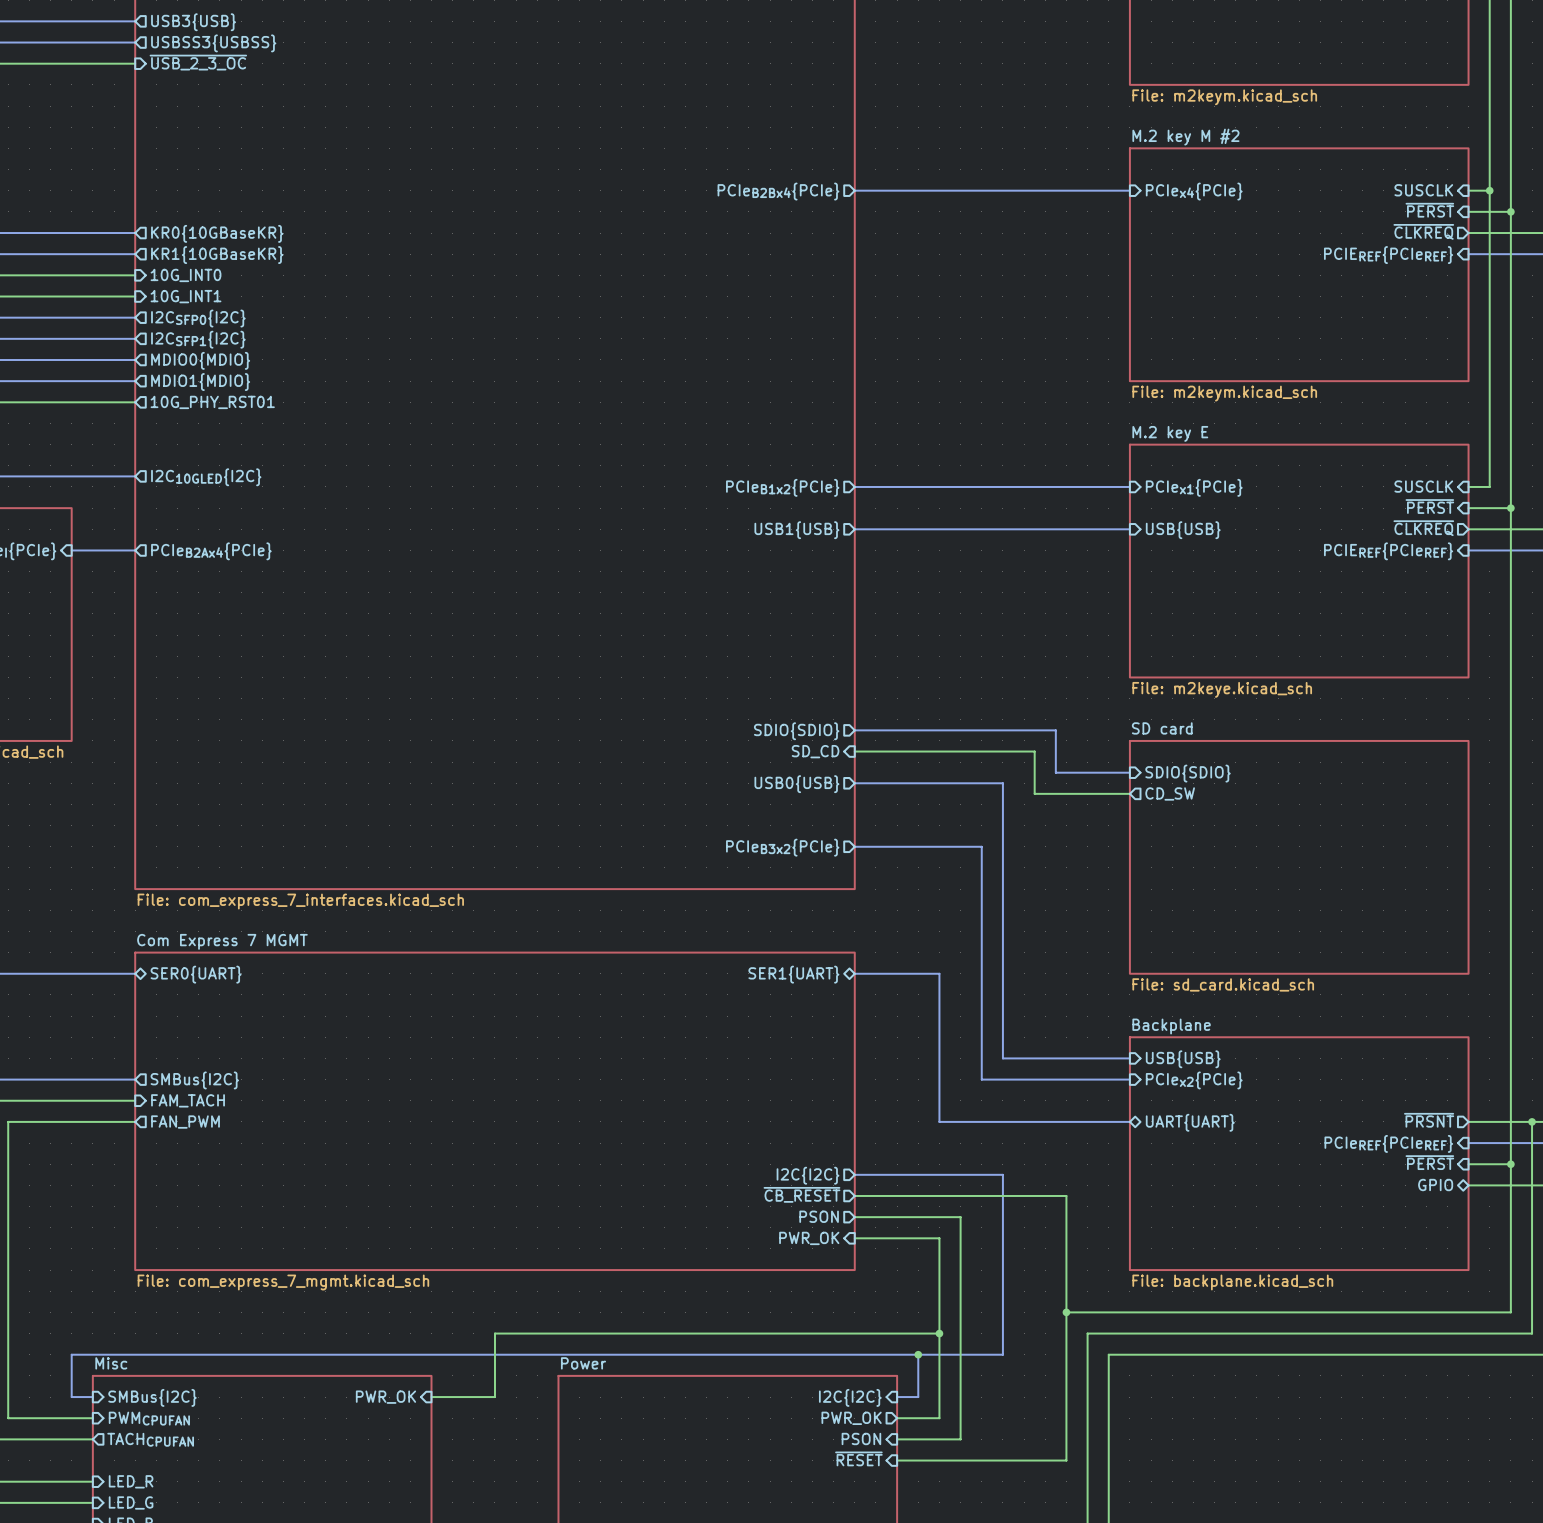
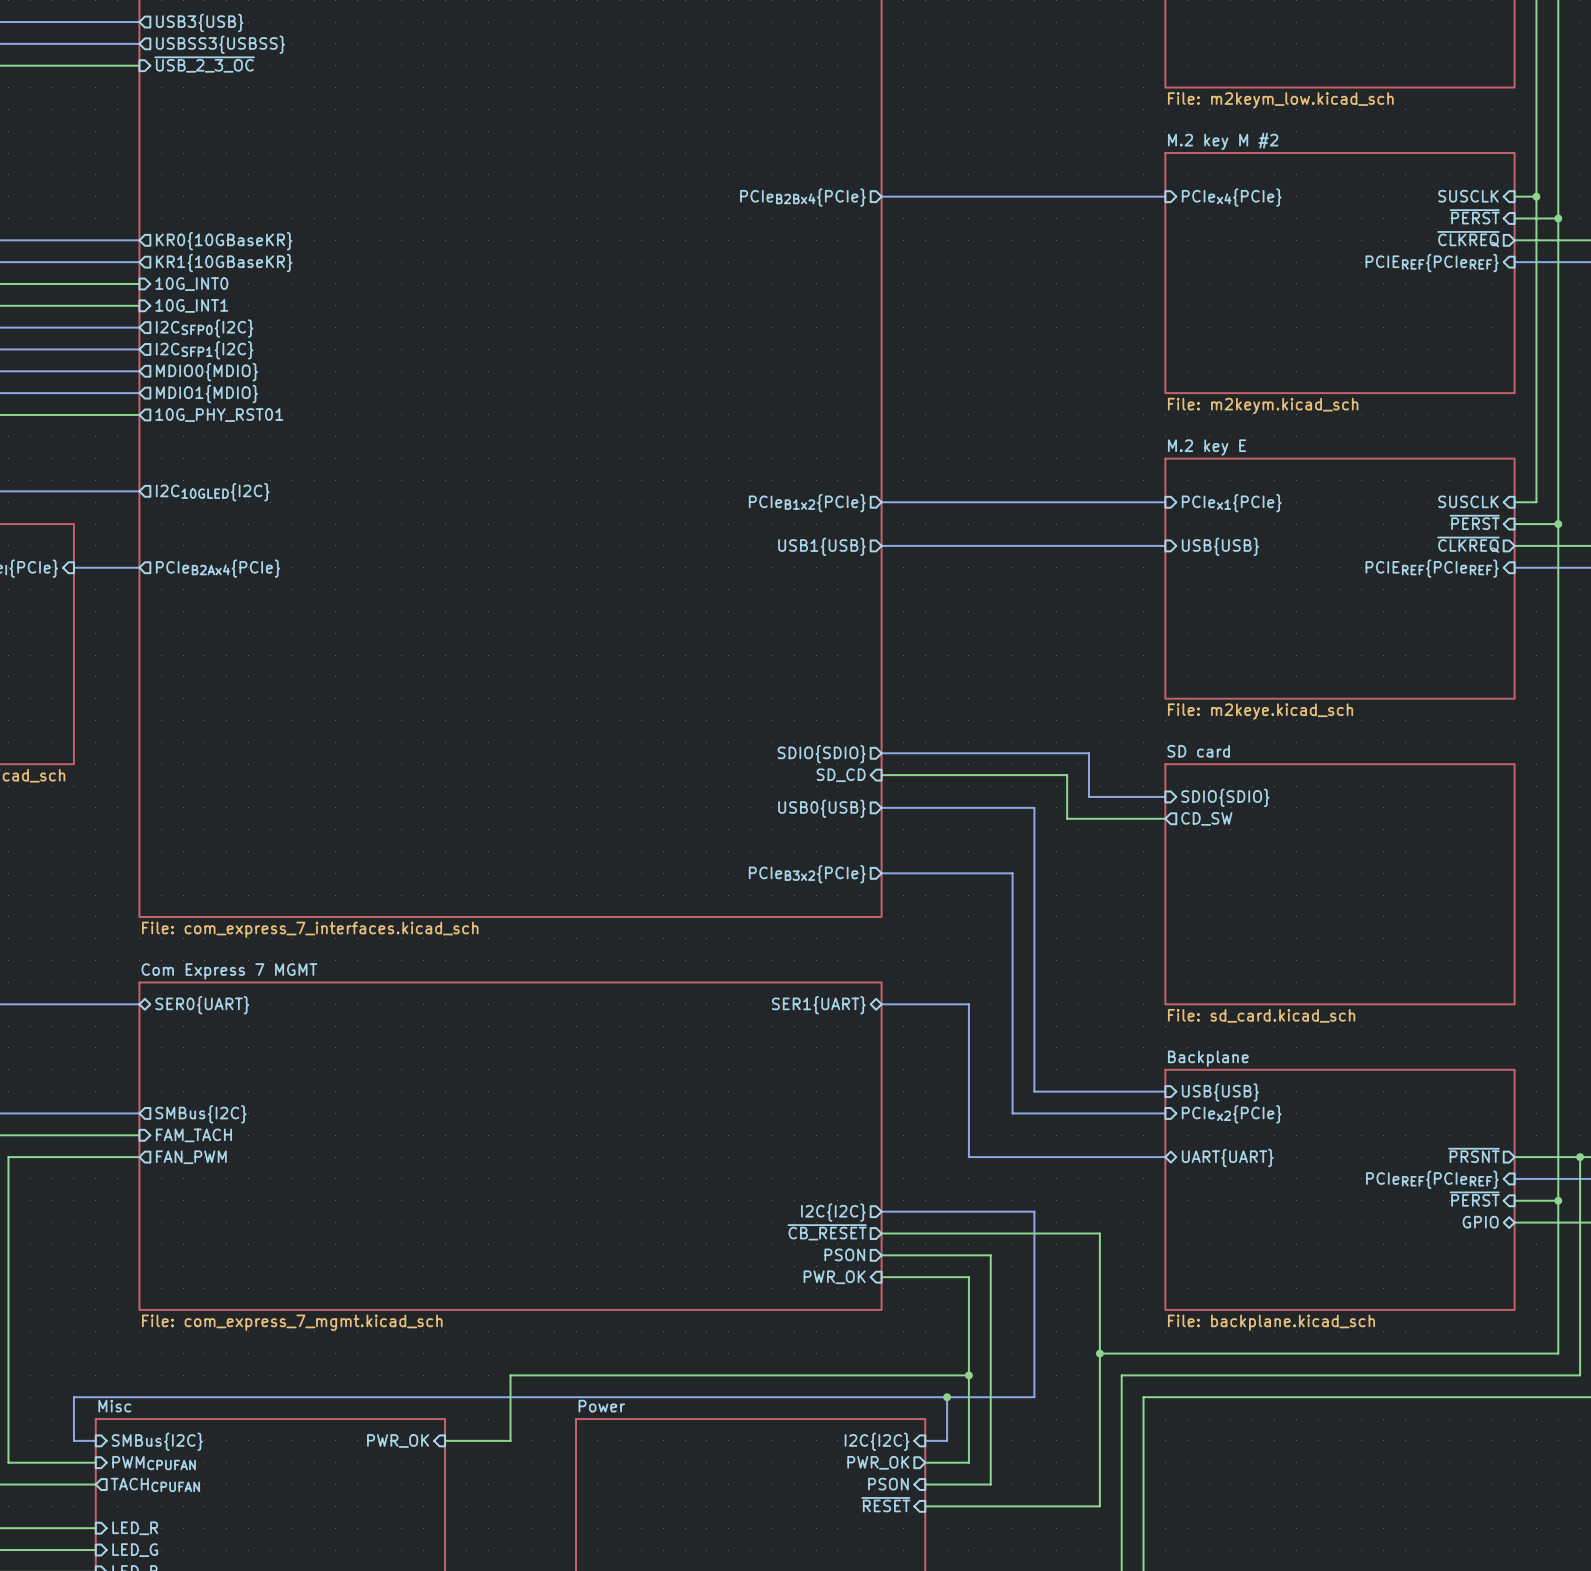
sheet value: File: m2keym.kicad_sch (1224, 97) -> File: m2keym_low.kicad_sch (1280, 100)

